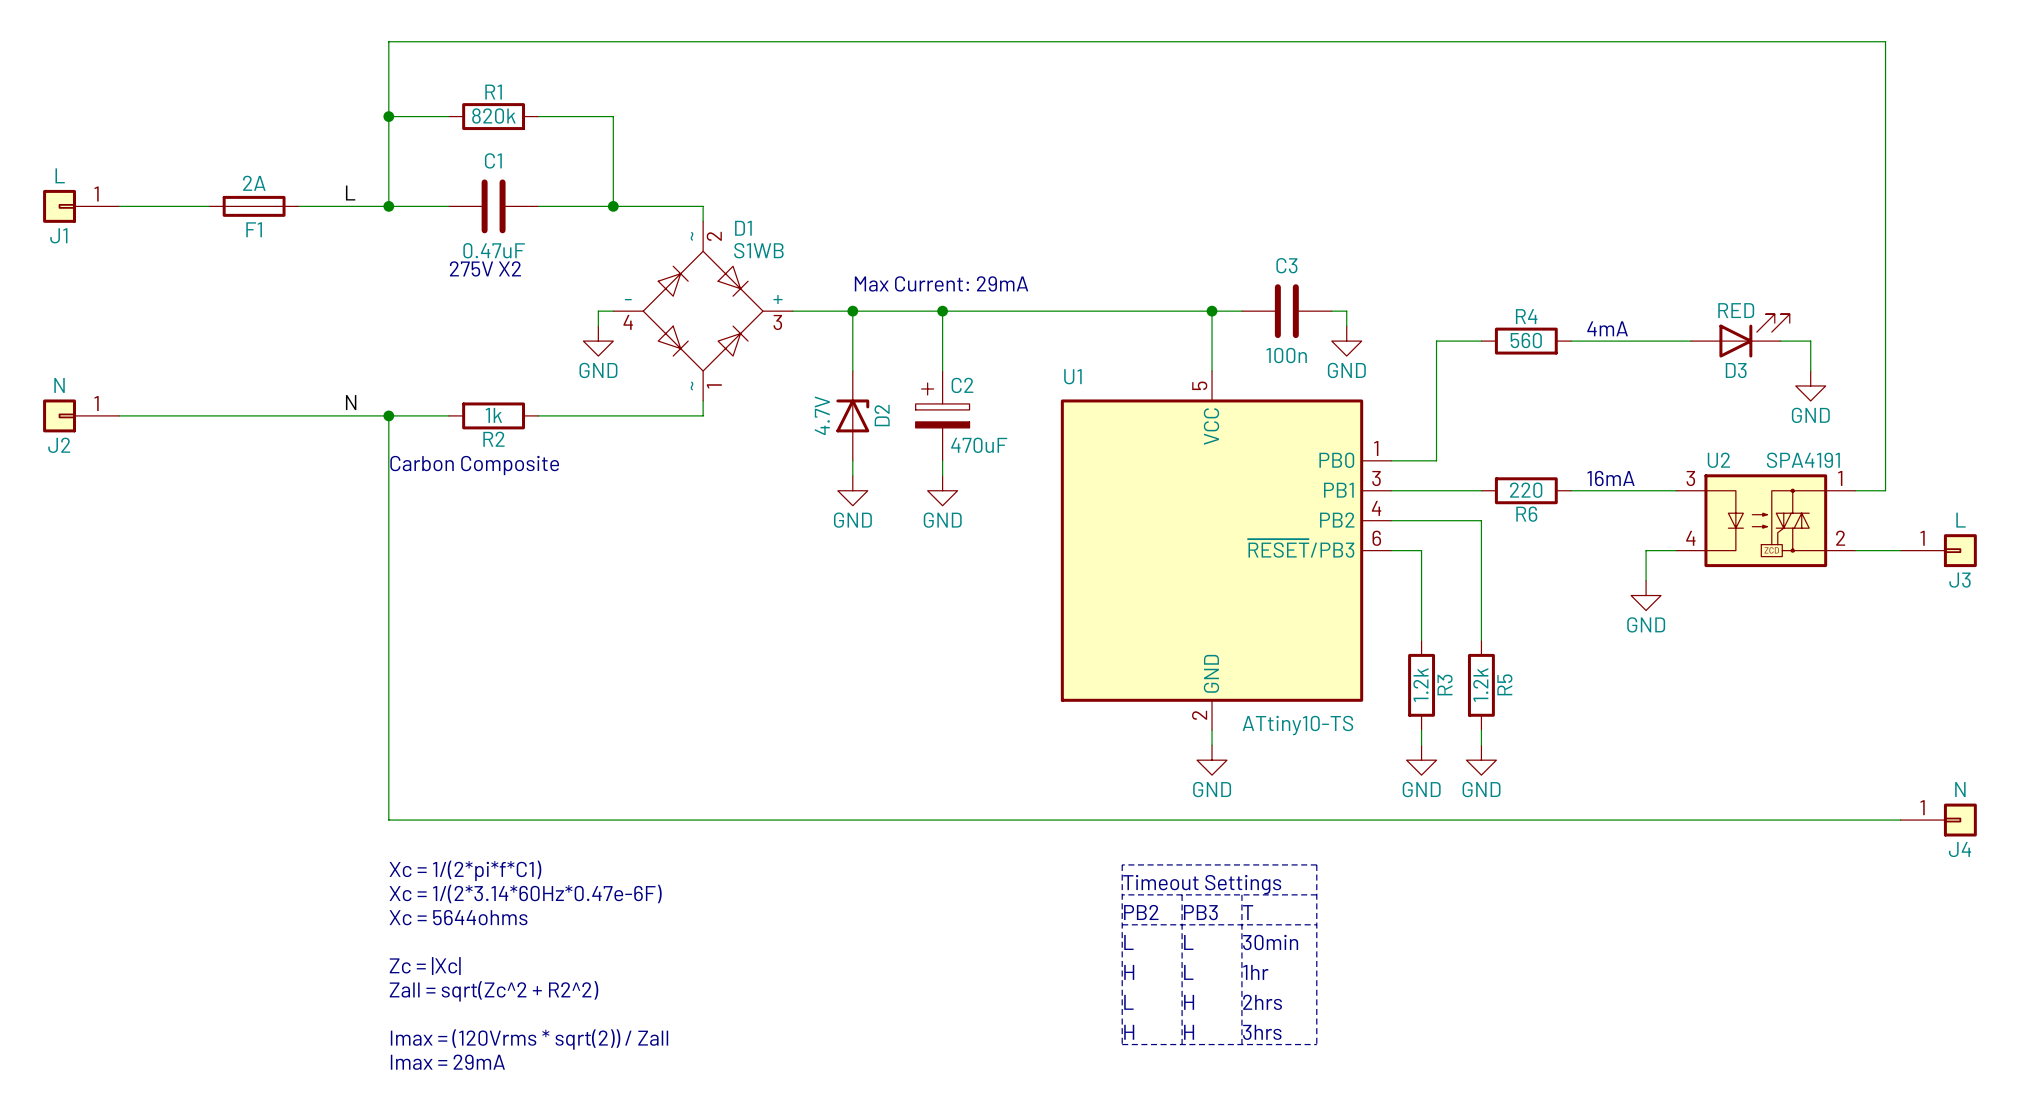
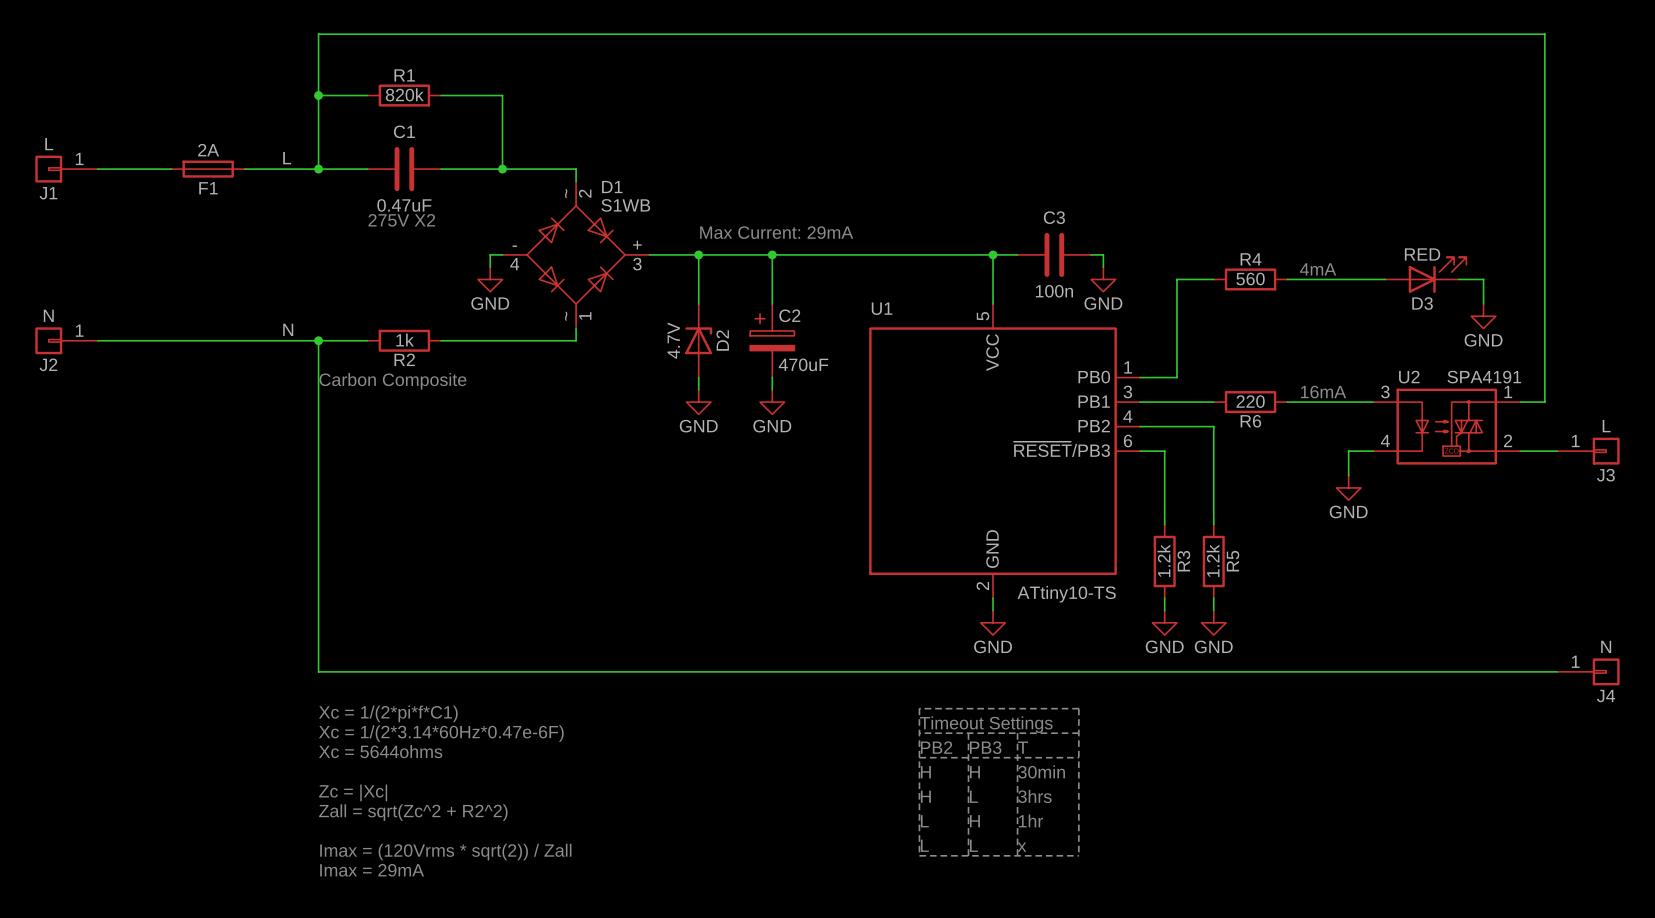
text: L (1128, 942) -> H (925, 772)
text: L (1188, 942) -> H (974, 772)
text: 1hr (1255, 972) -> 3hrs (1034, 796)
text: 2hrs (1262, 1002) -> 1hr (1030, 820)
text: H (1129, 1032) -> L (924, 845)
text: H (1189, 1032) -> L (973, 845)
text: 3hrs (1262, 1032) -> x (1022, 847)

